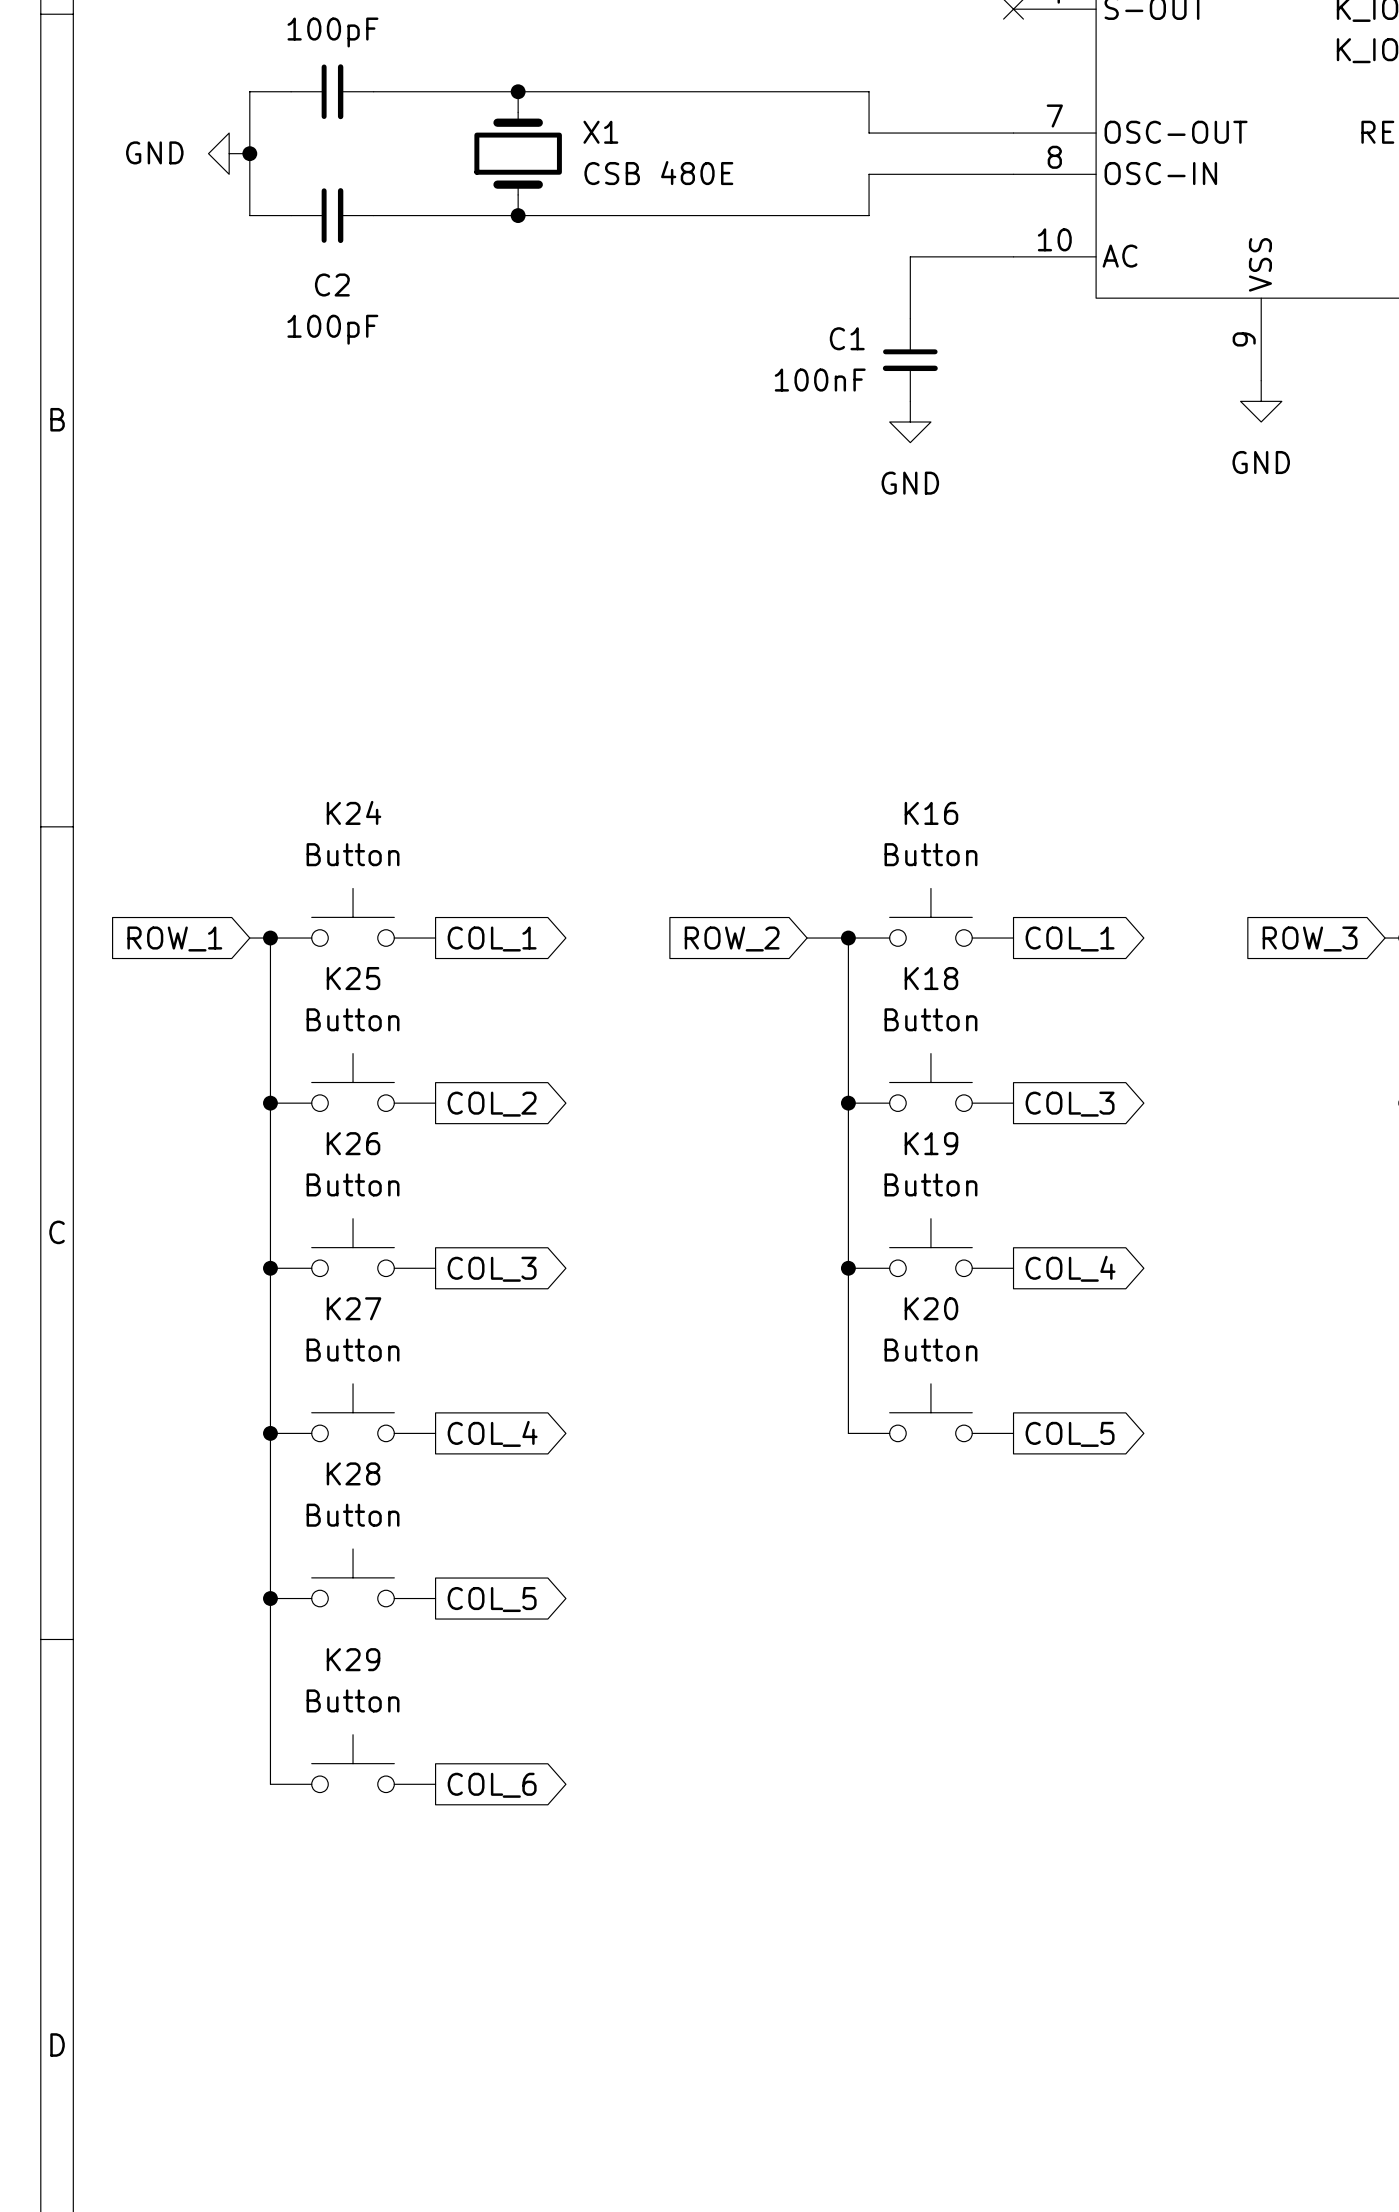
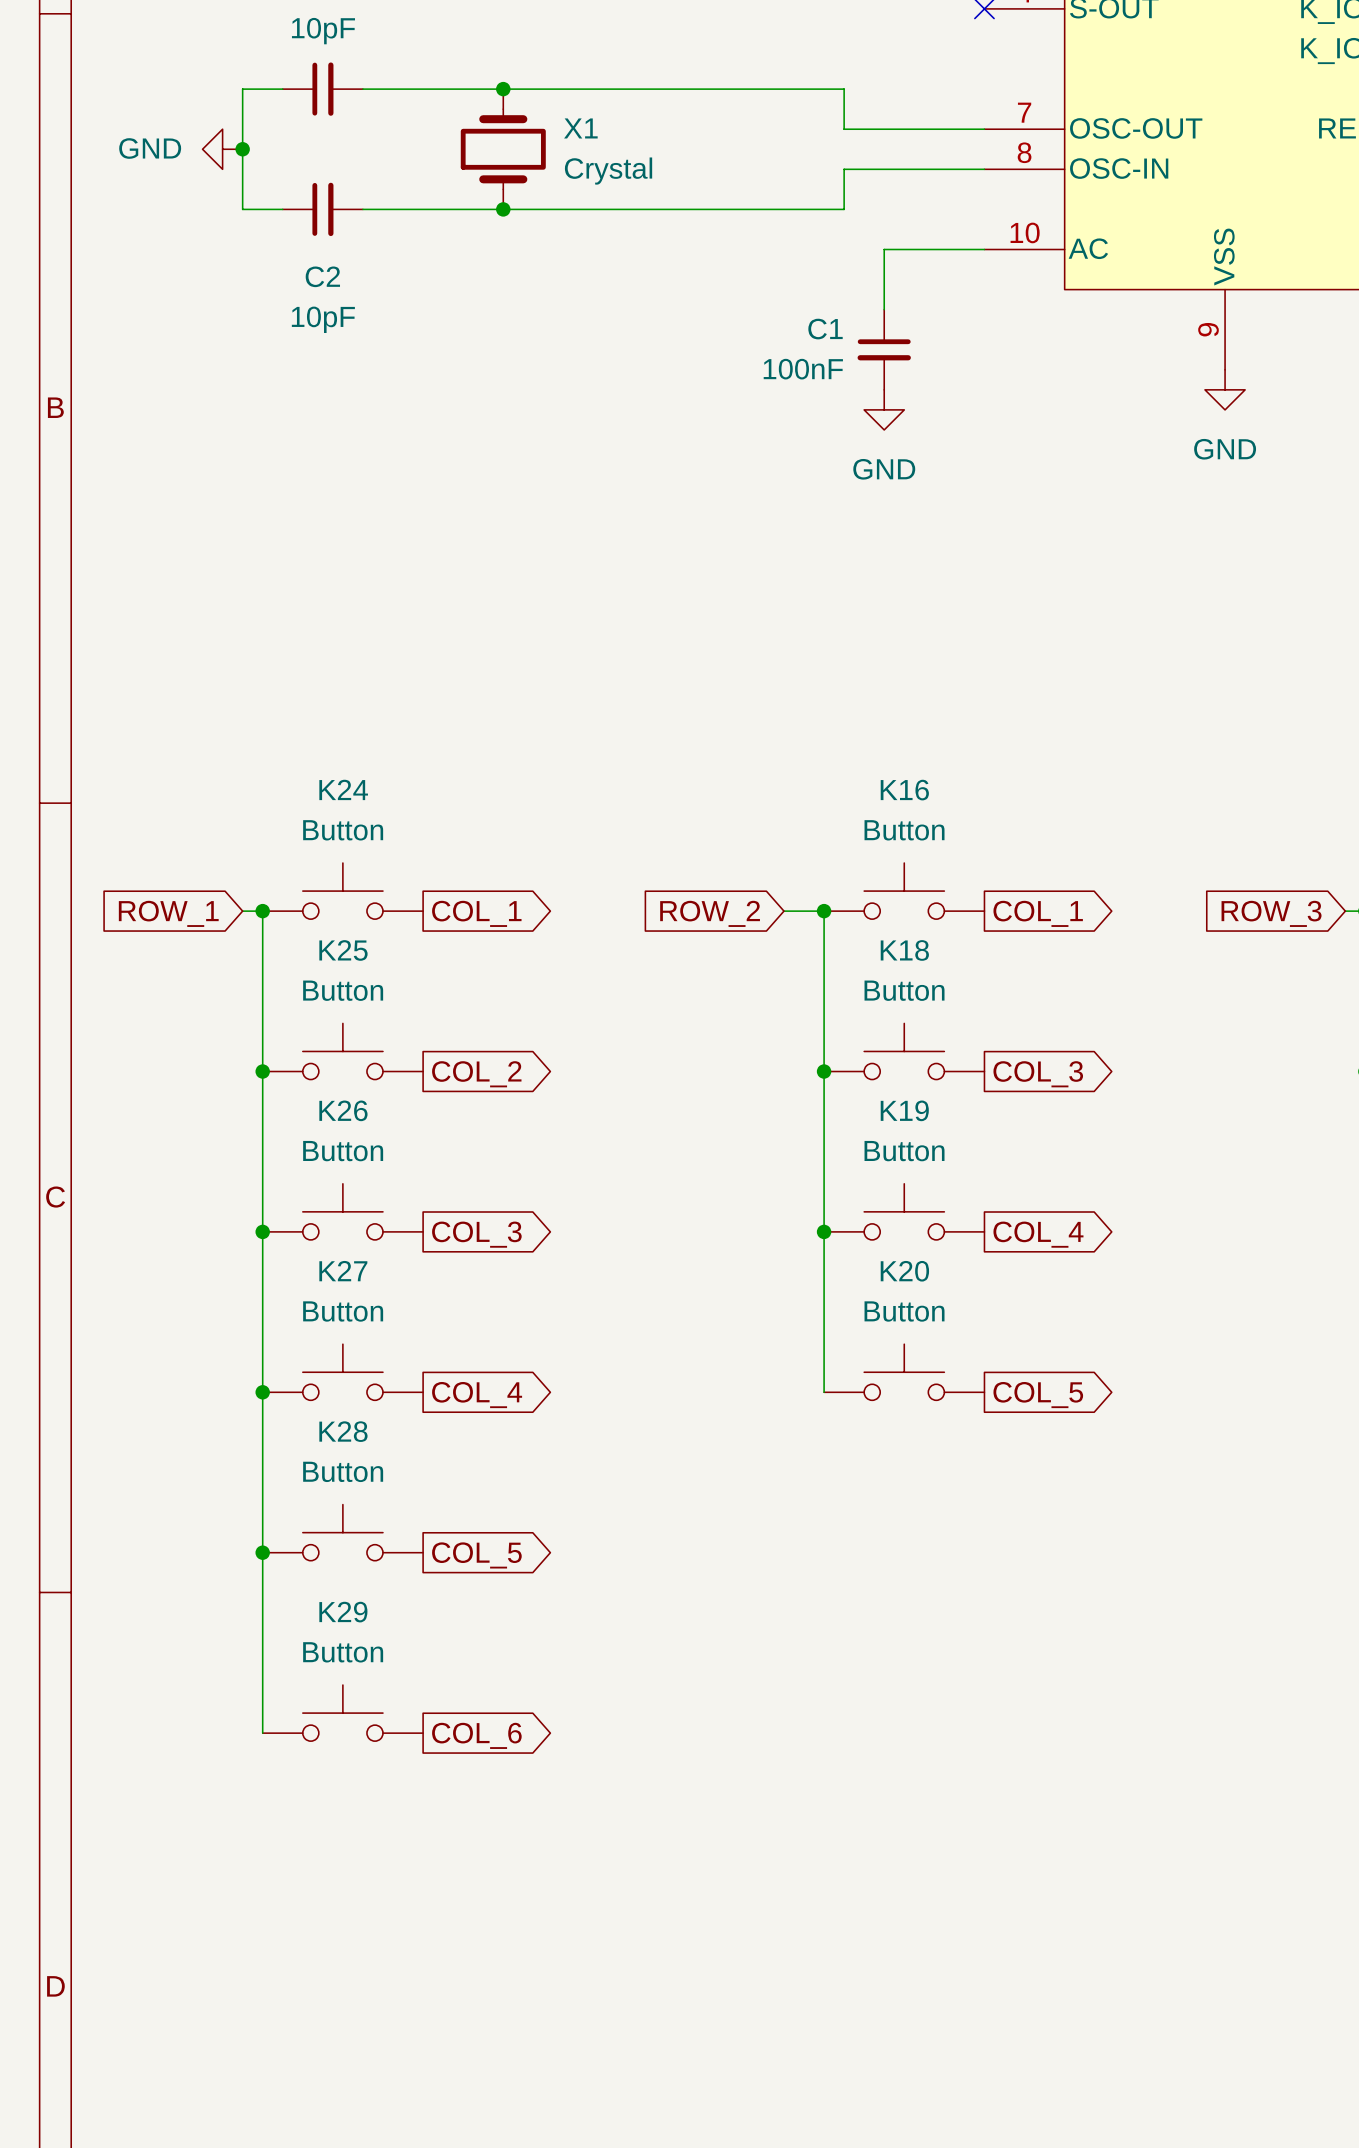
part value: 100pF (332, 32) -> 10pF (323, 31)
X1 value: CSB 480E (658, 173) -> Crystal (608, 171)
C2 value: 100pF (332, 329) -> 10pF (323, 319)

